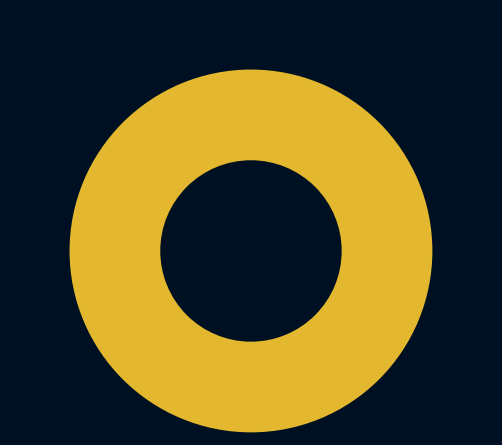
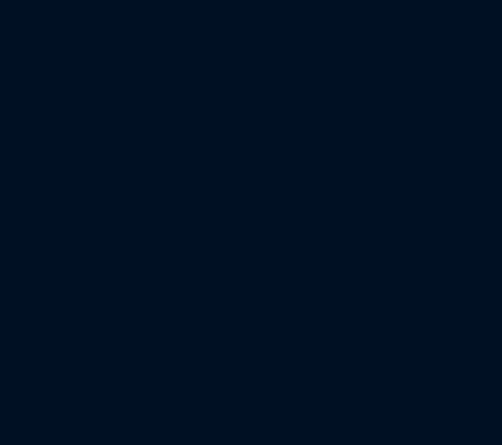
part: (250, 250) -> none

